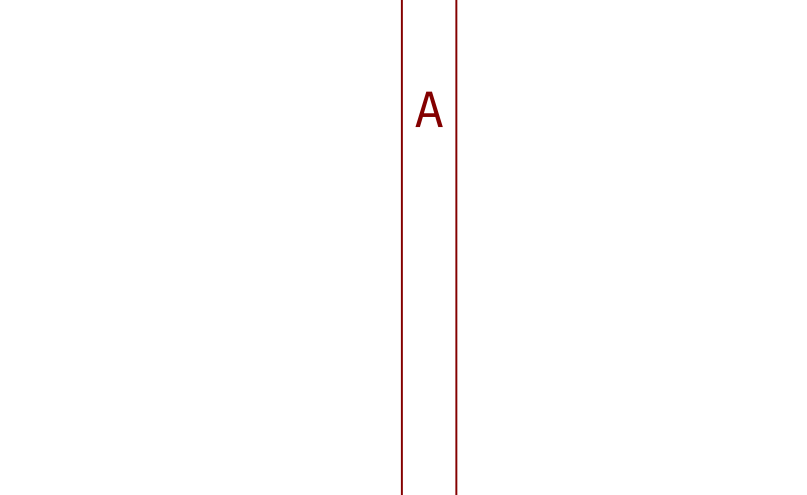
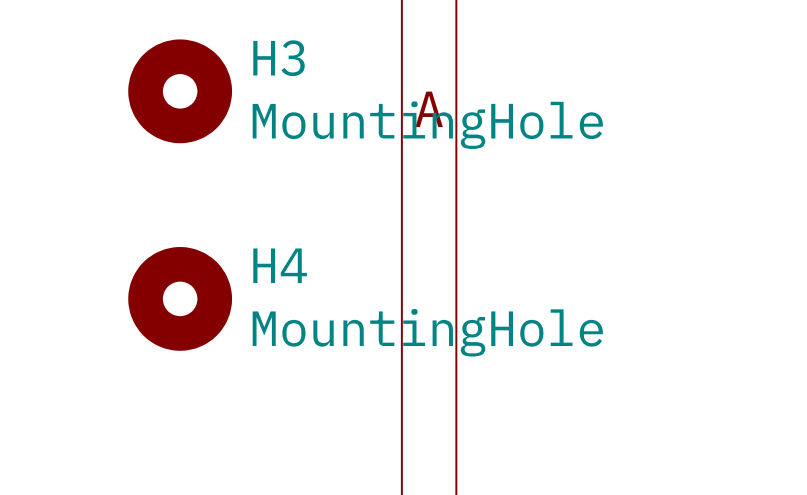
H3: none -> MountingHole (180, 91)
H4: none -> MountingHole (180, 298)

